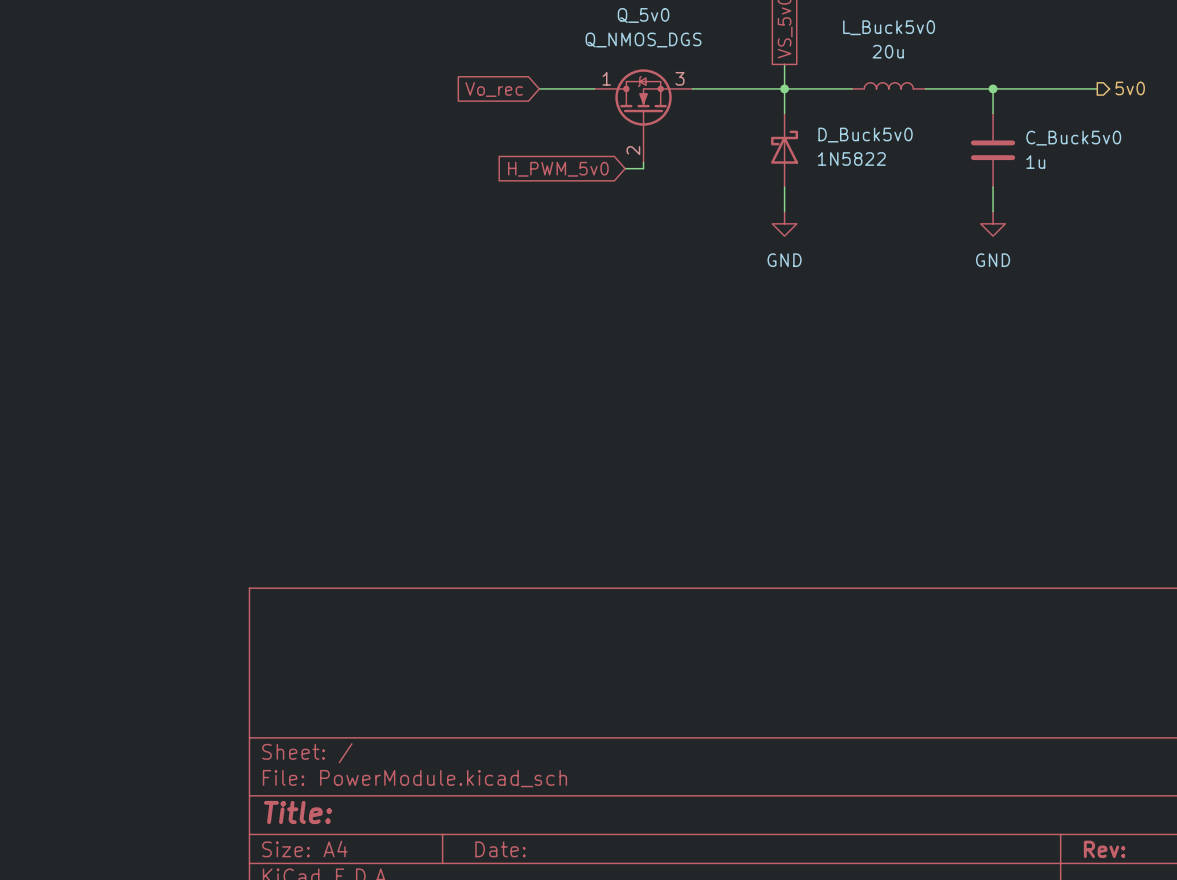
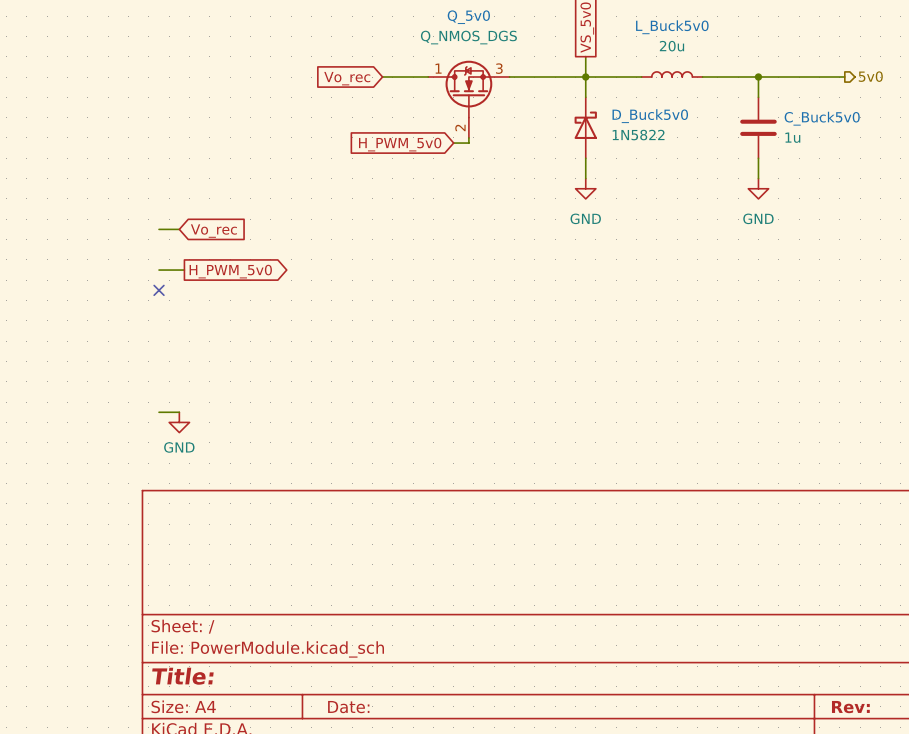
wire: none -> (159, 229) (179, 229)
global label: none -> Vo_rec (213, 231)
wire: none -> (159, 270) (184, 270)
global label: none -> H_PWM_5v0 (230, 271)
no-connect mark: none -> (159, 290)
wire: none -> (159, 412) (179, 412)
power symbol: none -> GND (179, 422)

